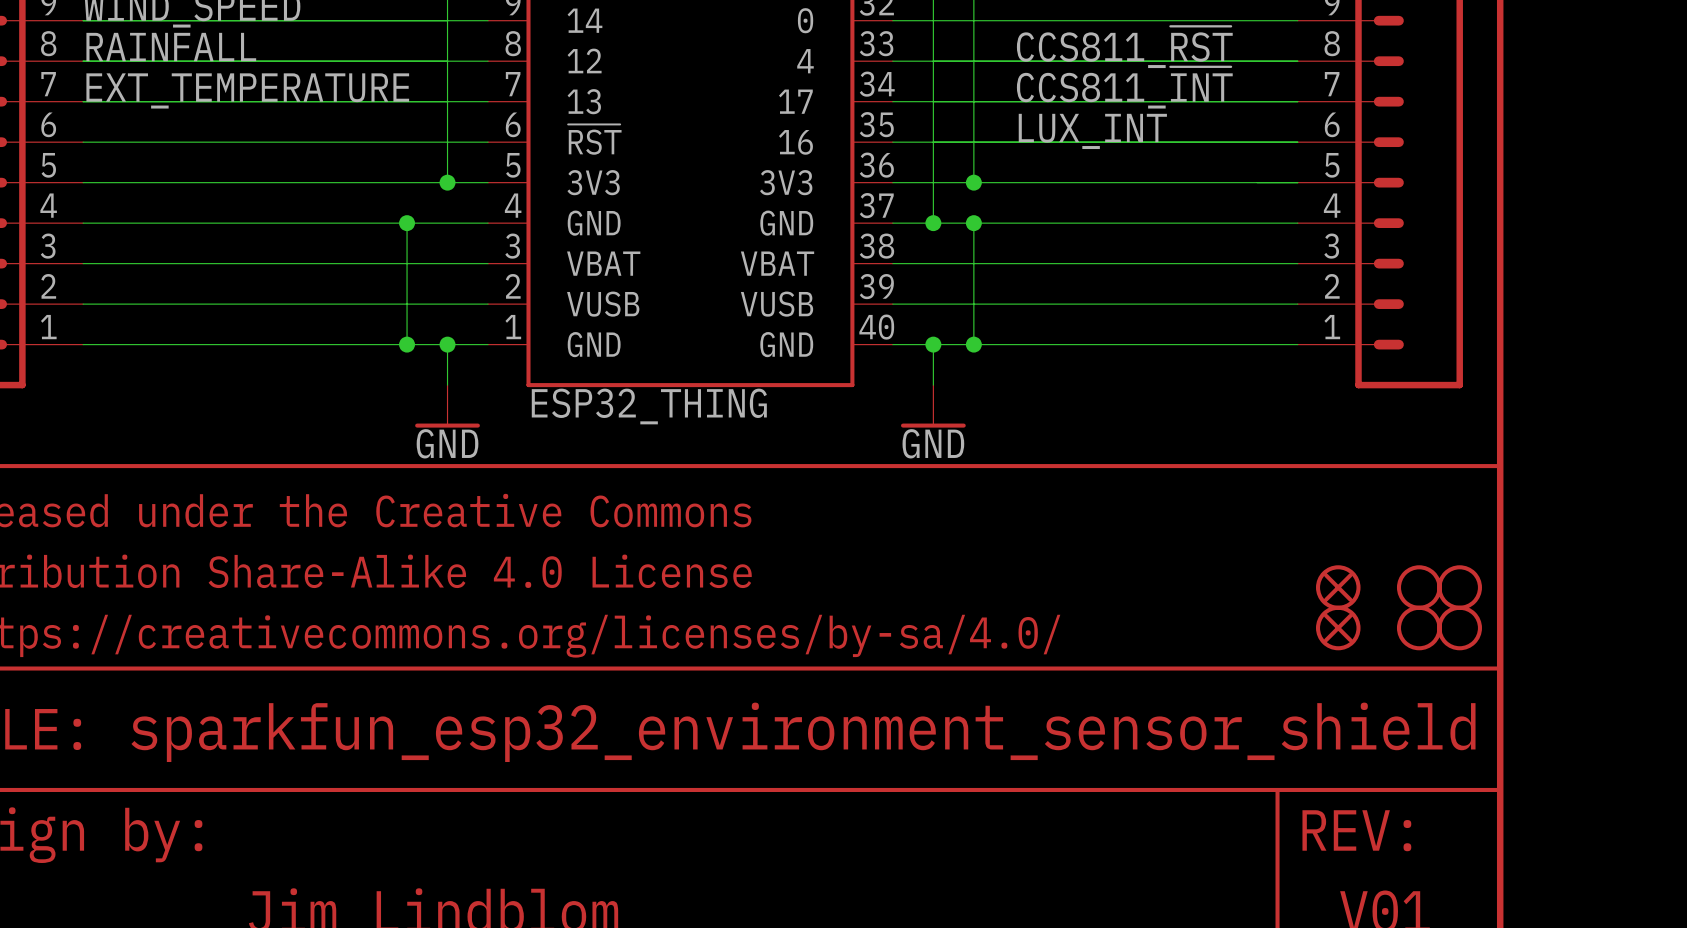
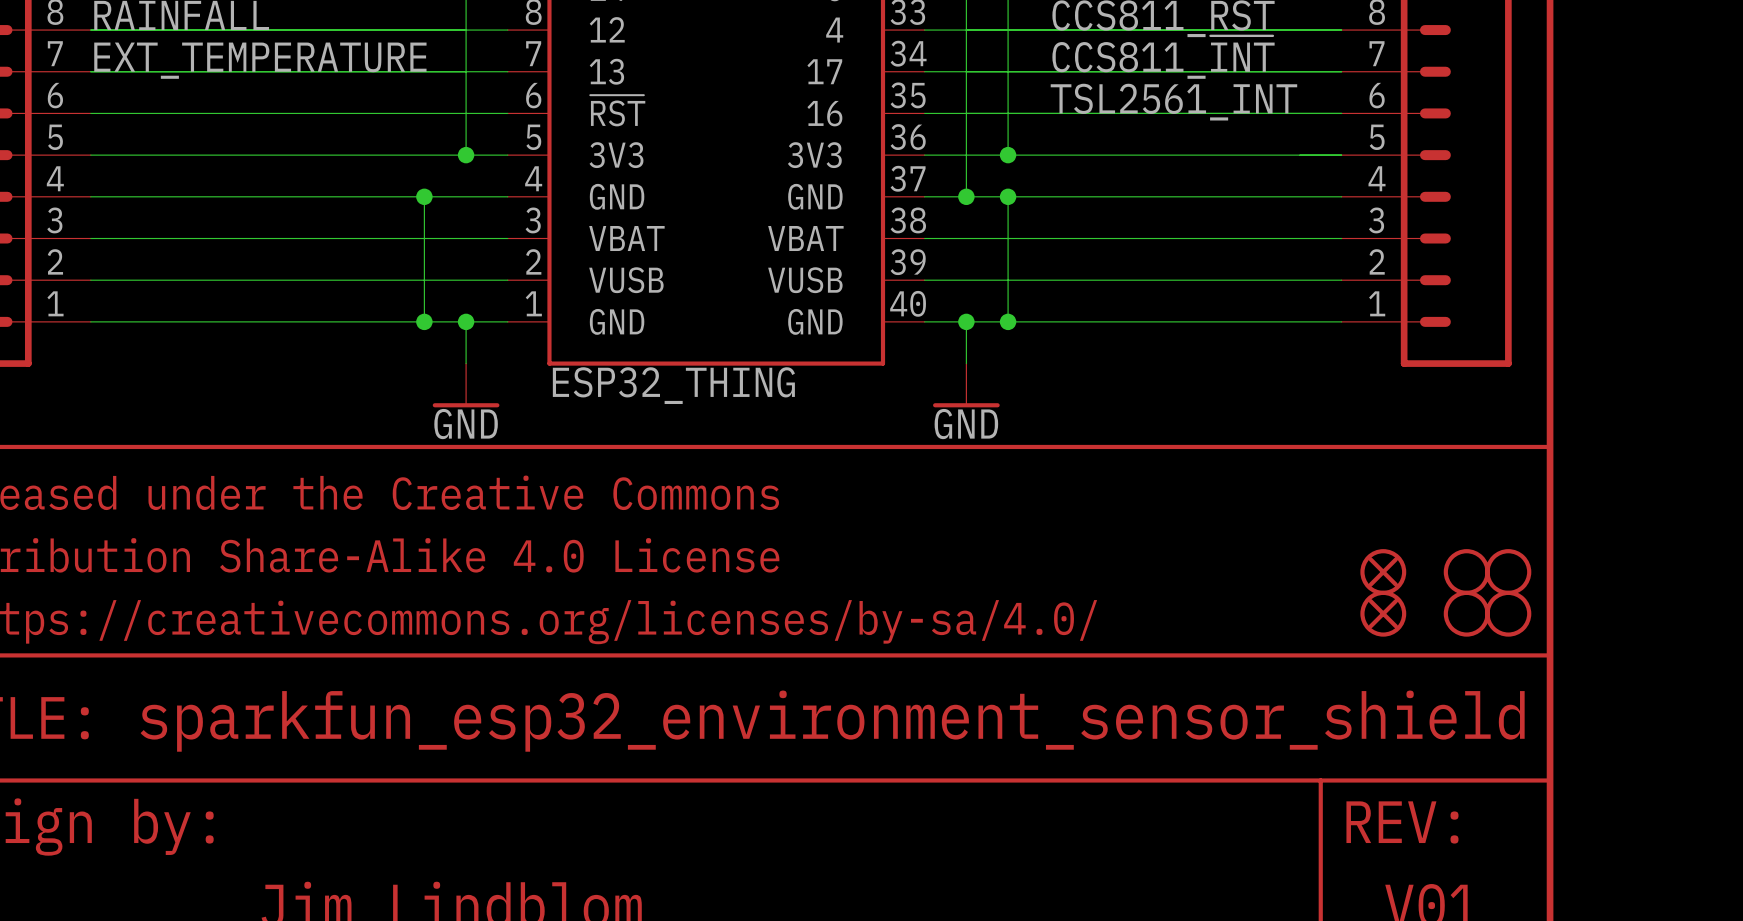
label: LUX_INT (1092, 131) -> TSL2561_INT (1173, 102)

